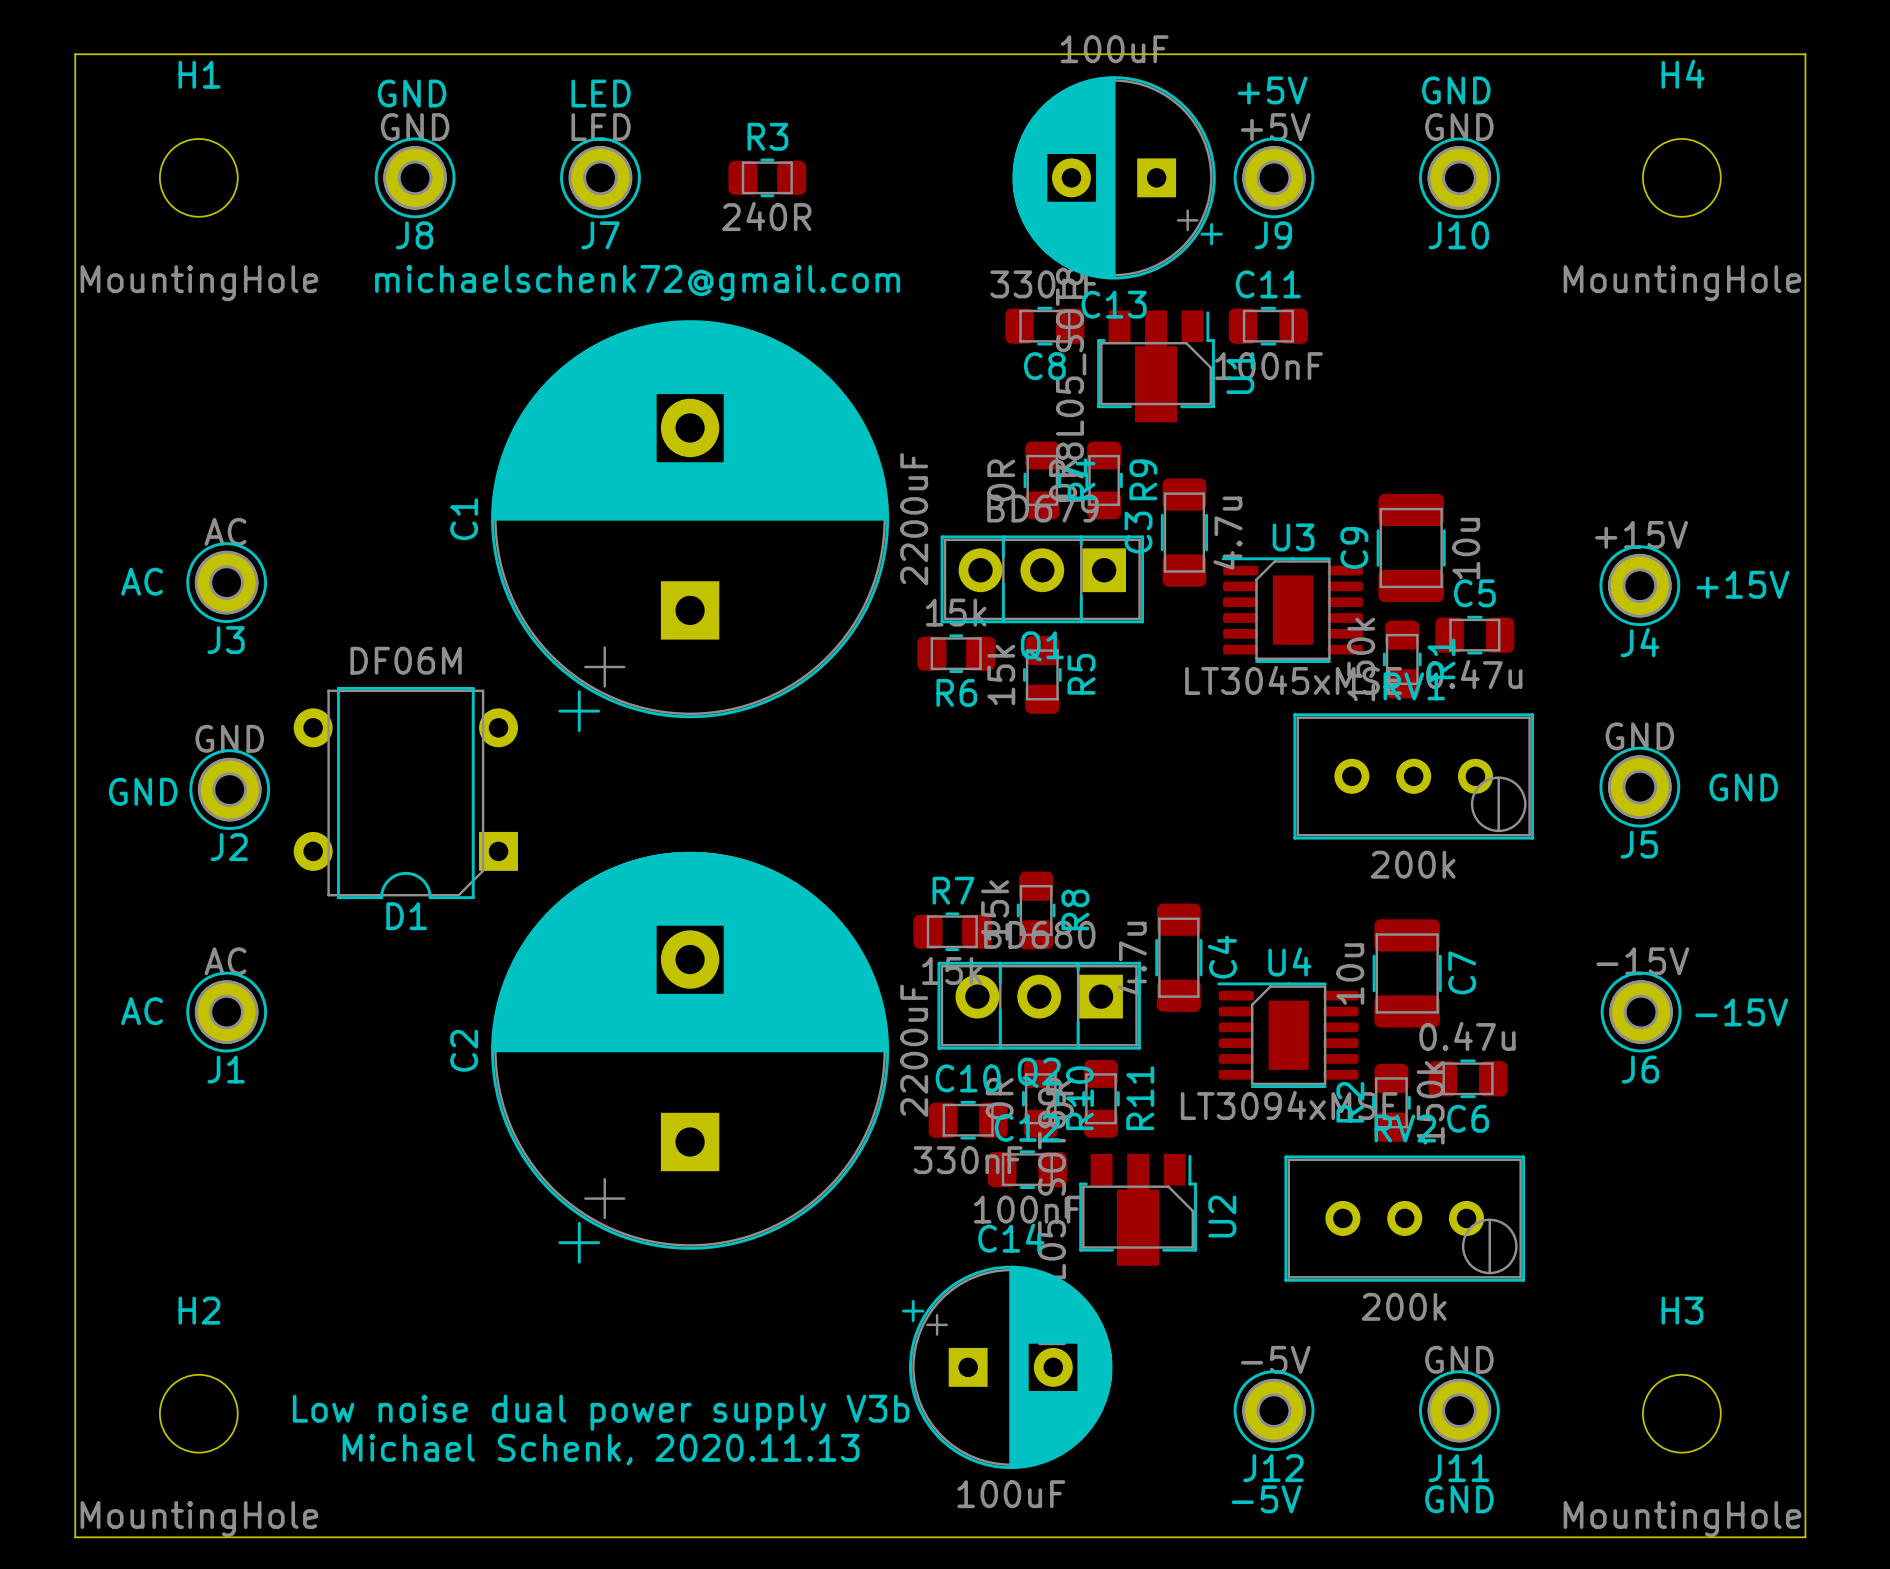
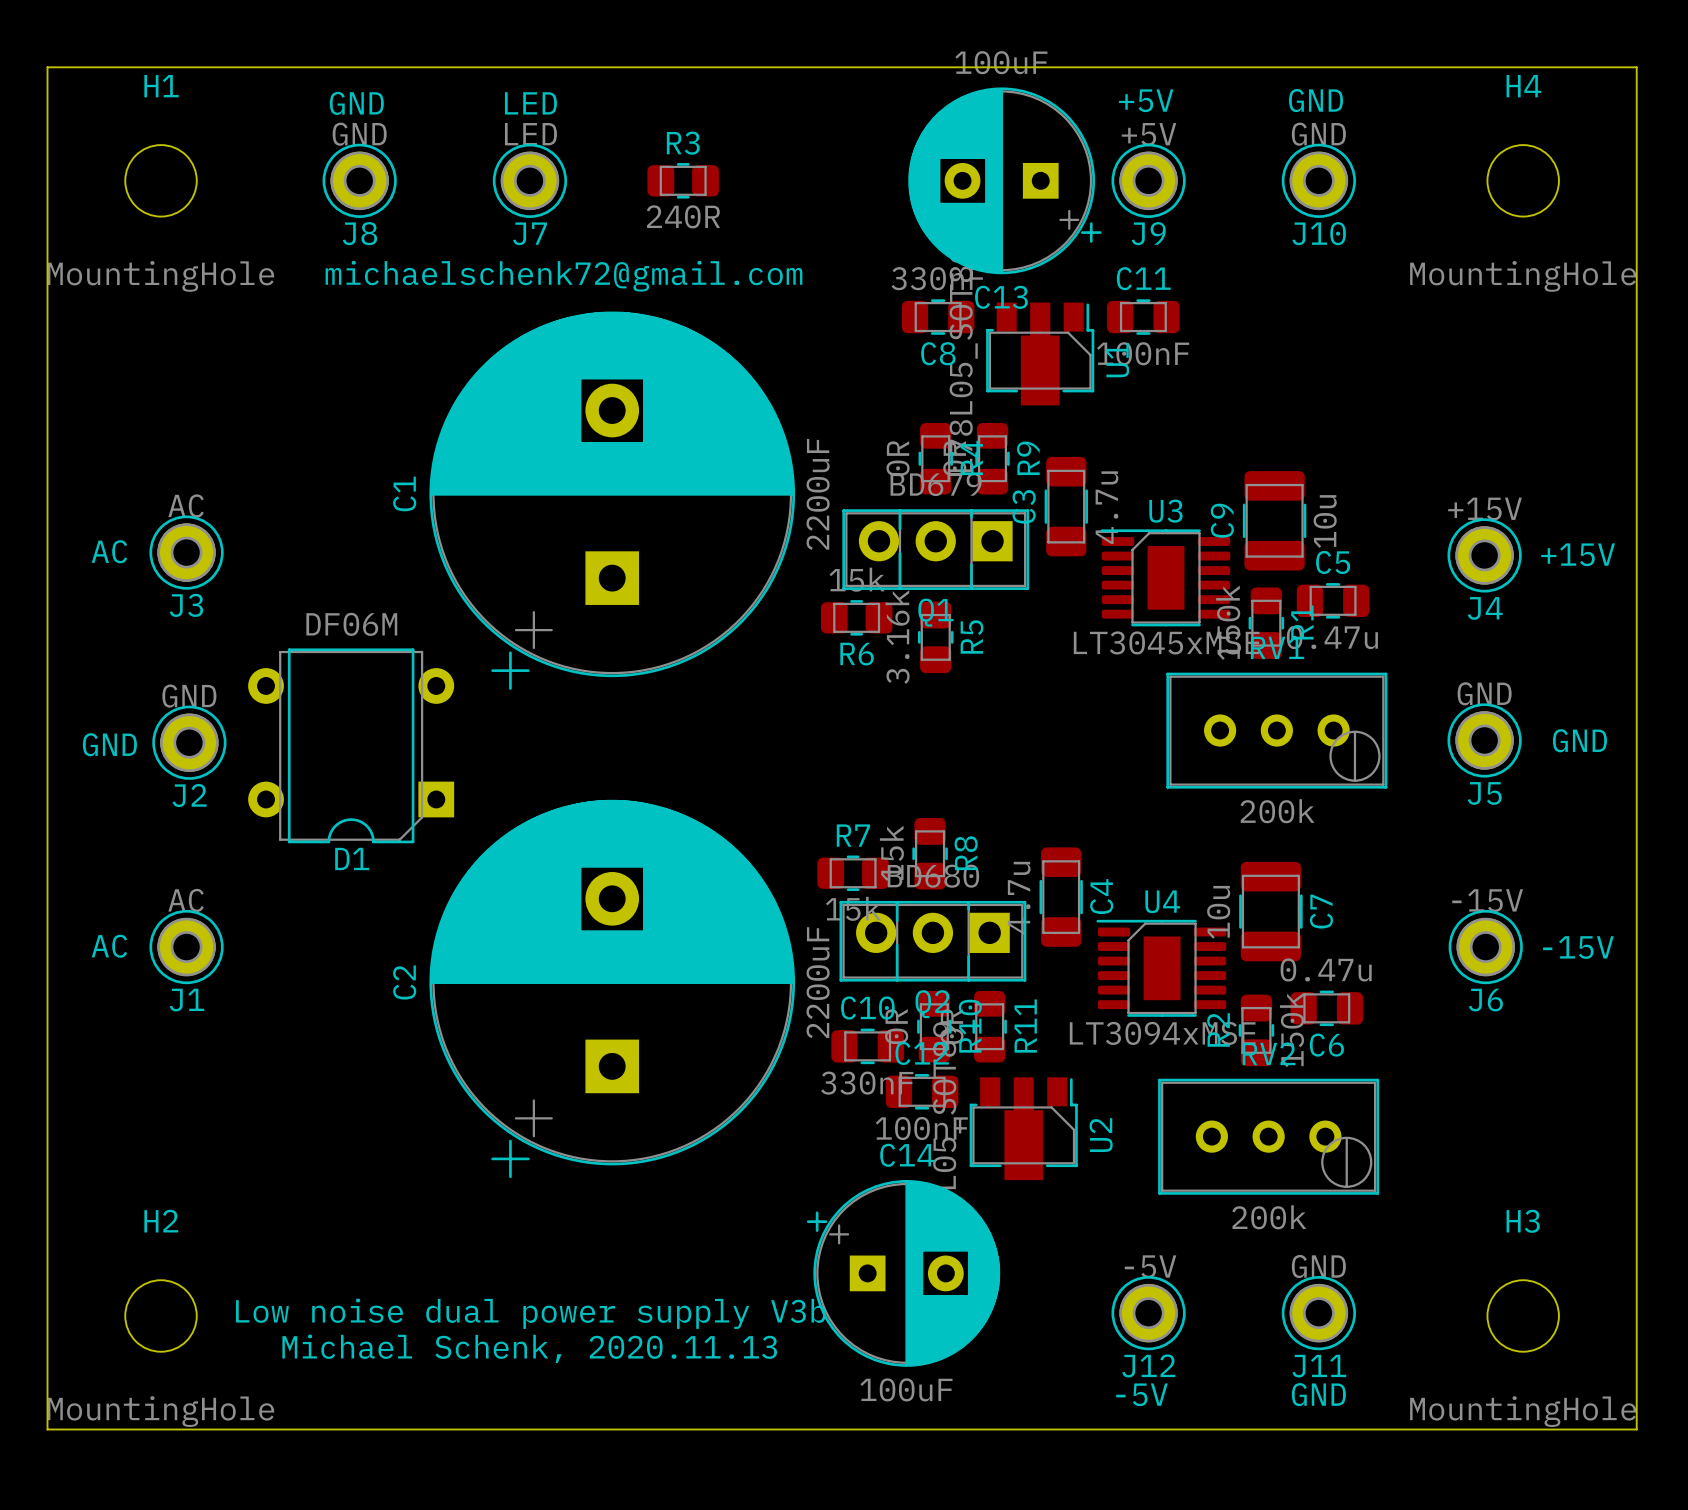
R5 value: 15k (1001, 674) -> 3.16k (897, 637)

